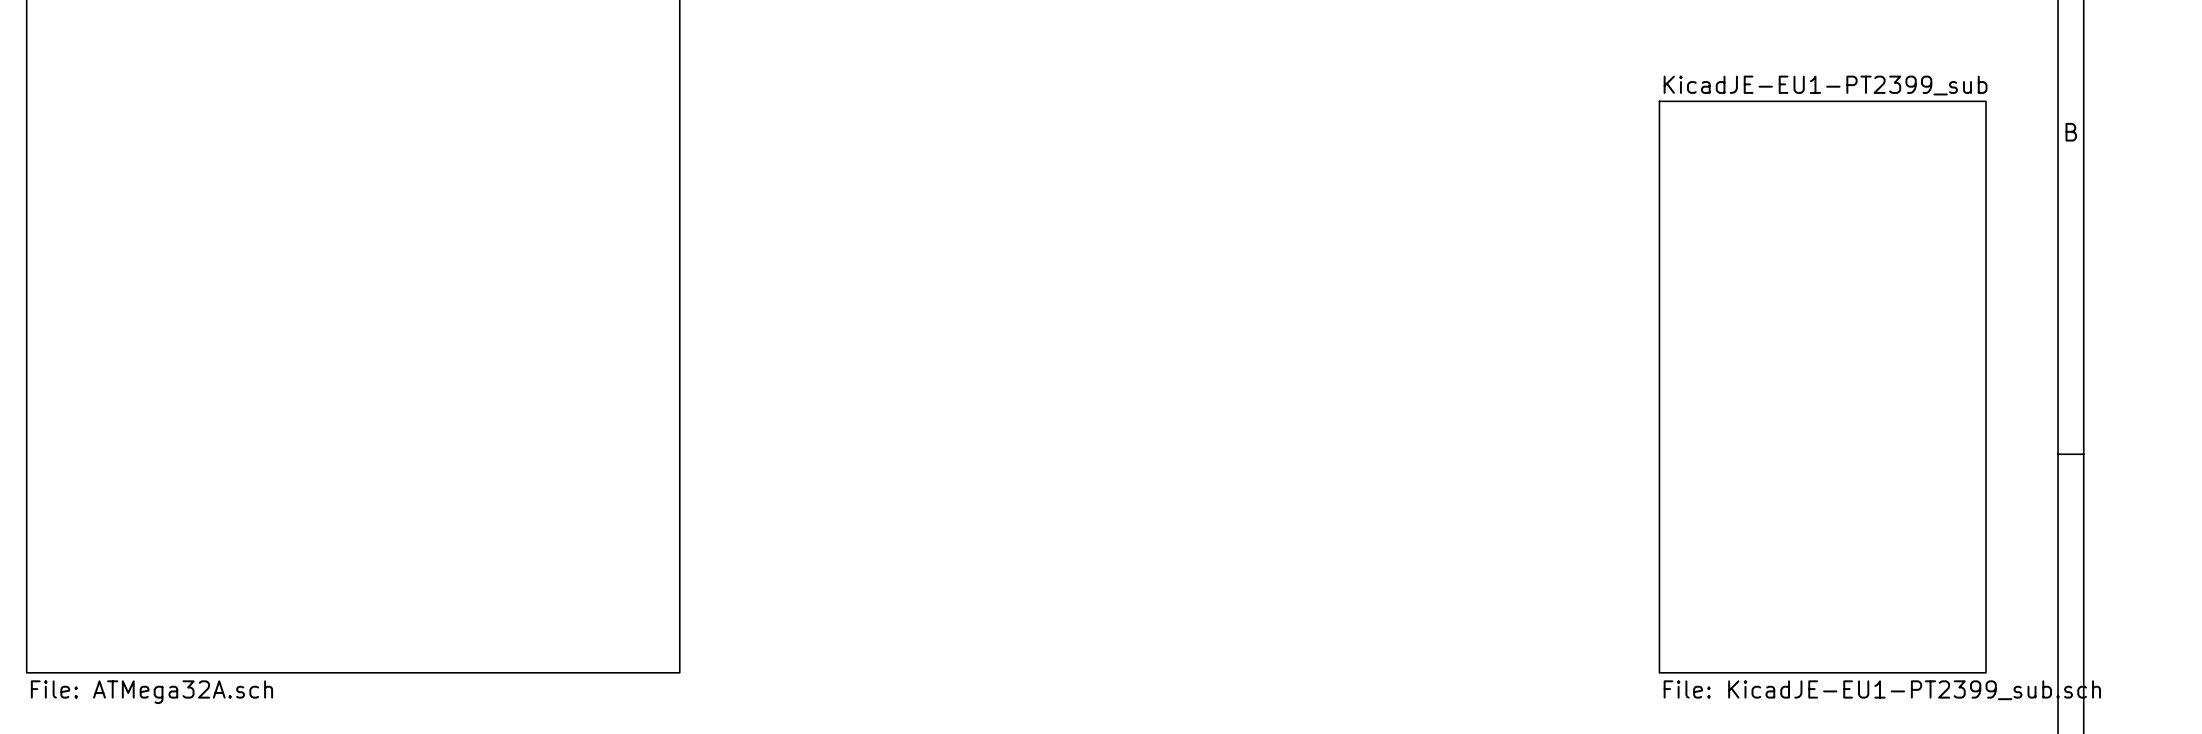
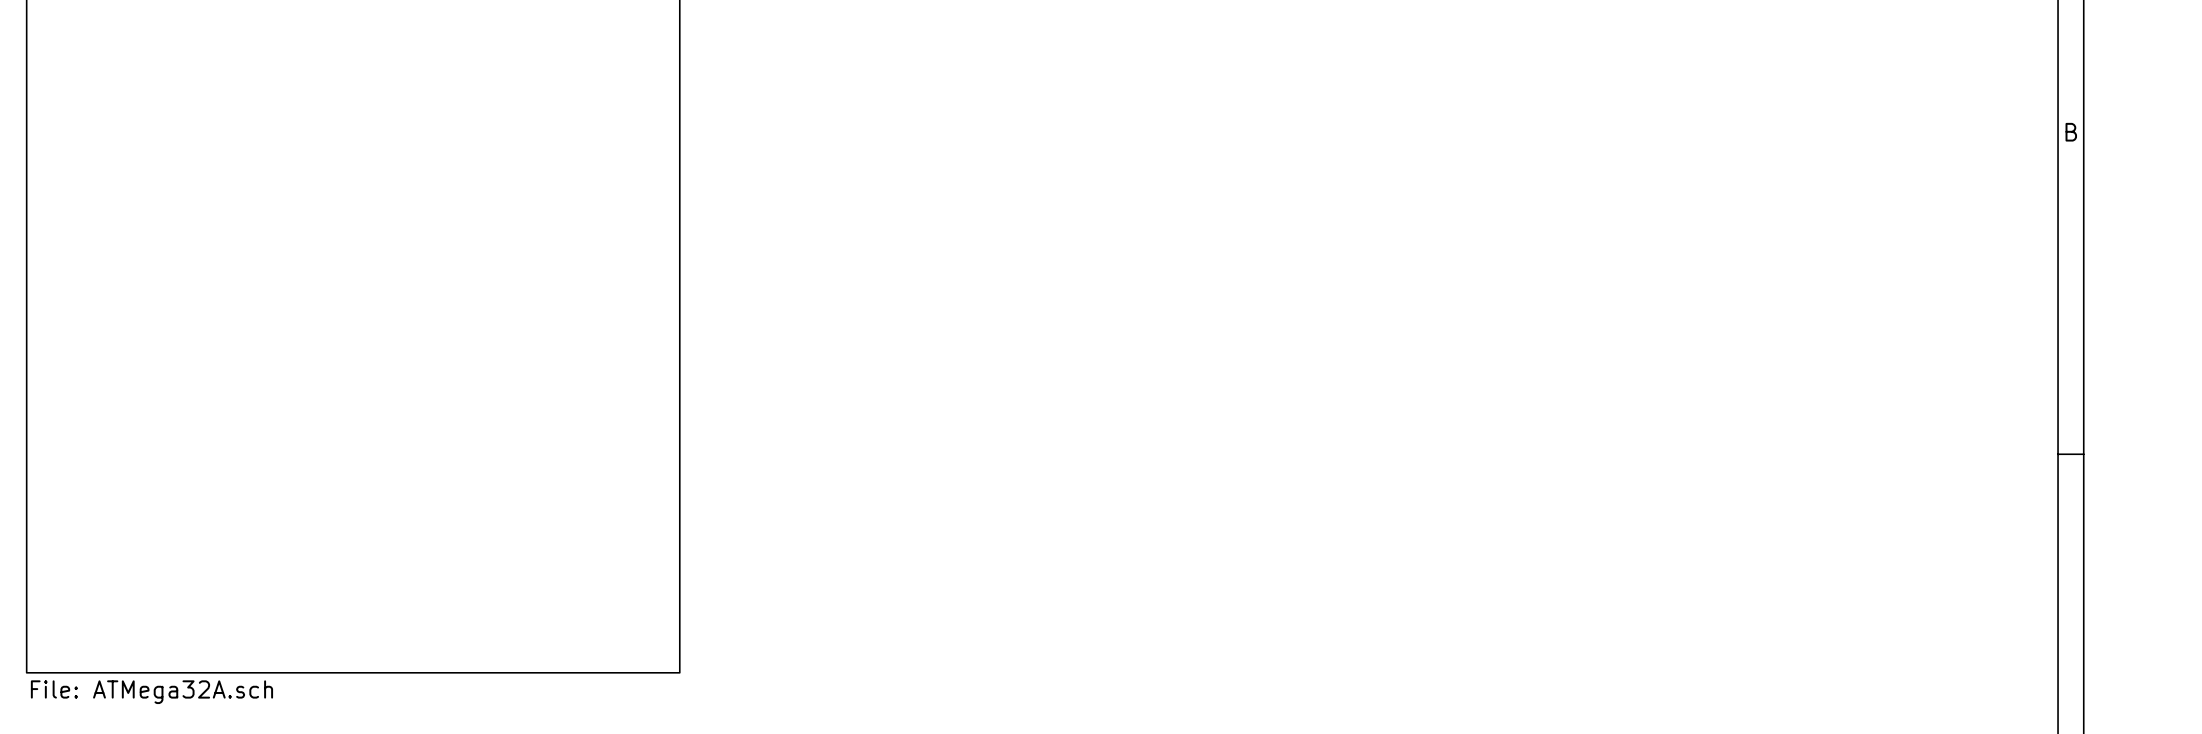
sheet KicadJE-EU1-PT2399_sub: File: KicadJE-EU1-PT2399_sub.sch (1822, 387) -> none

